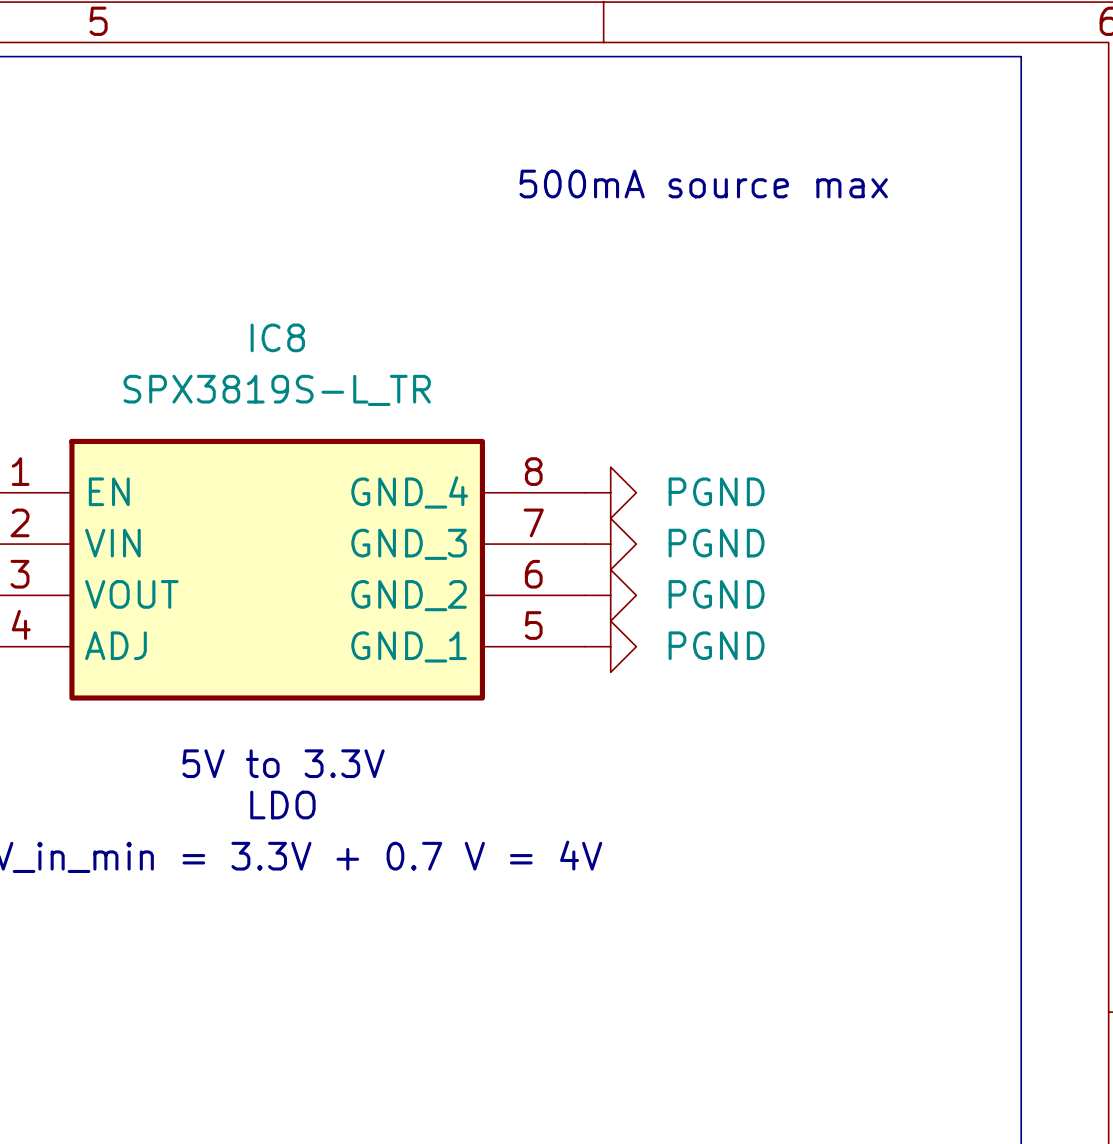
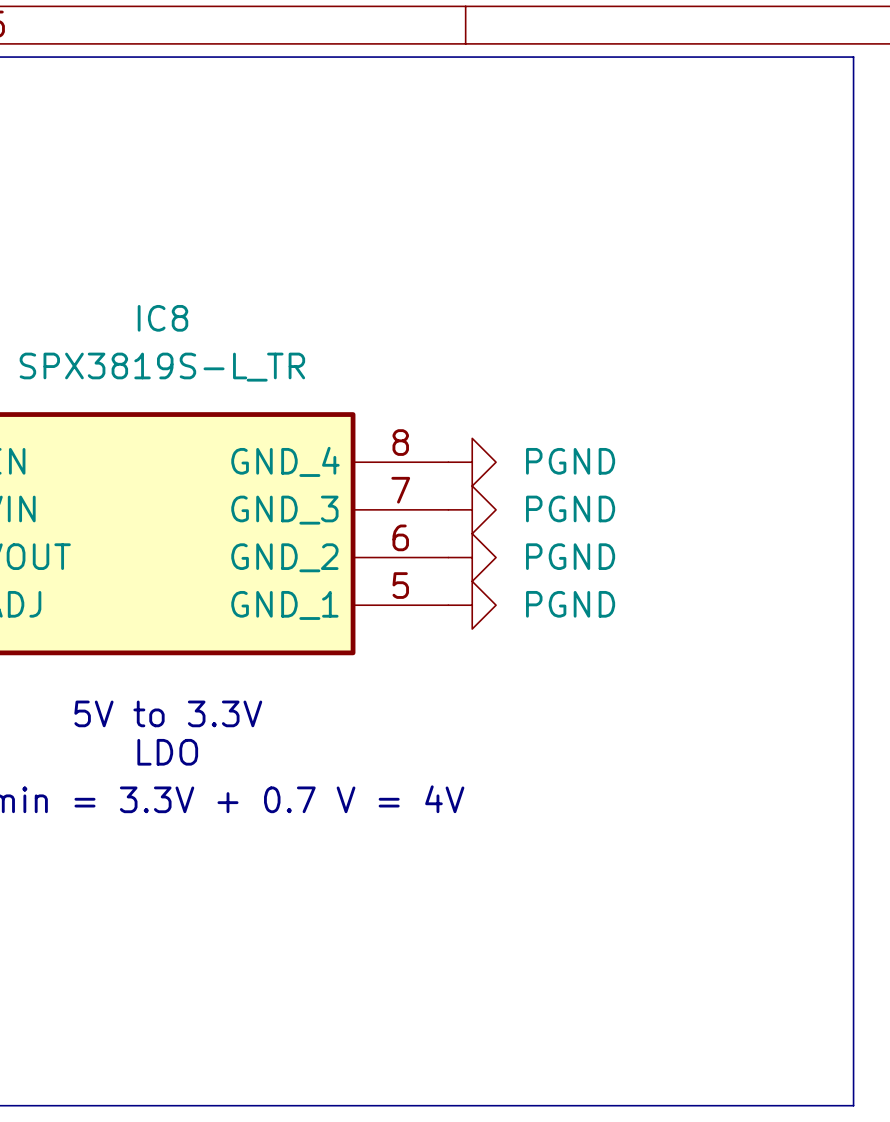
text: 500mA source max (703, 184) -> none

